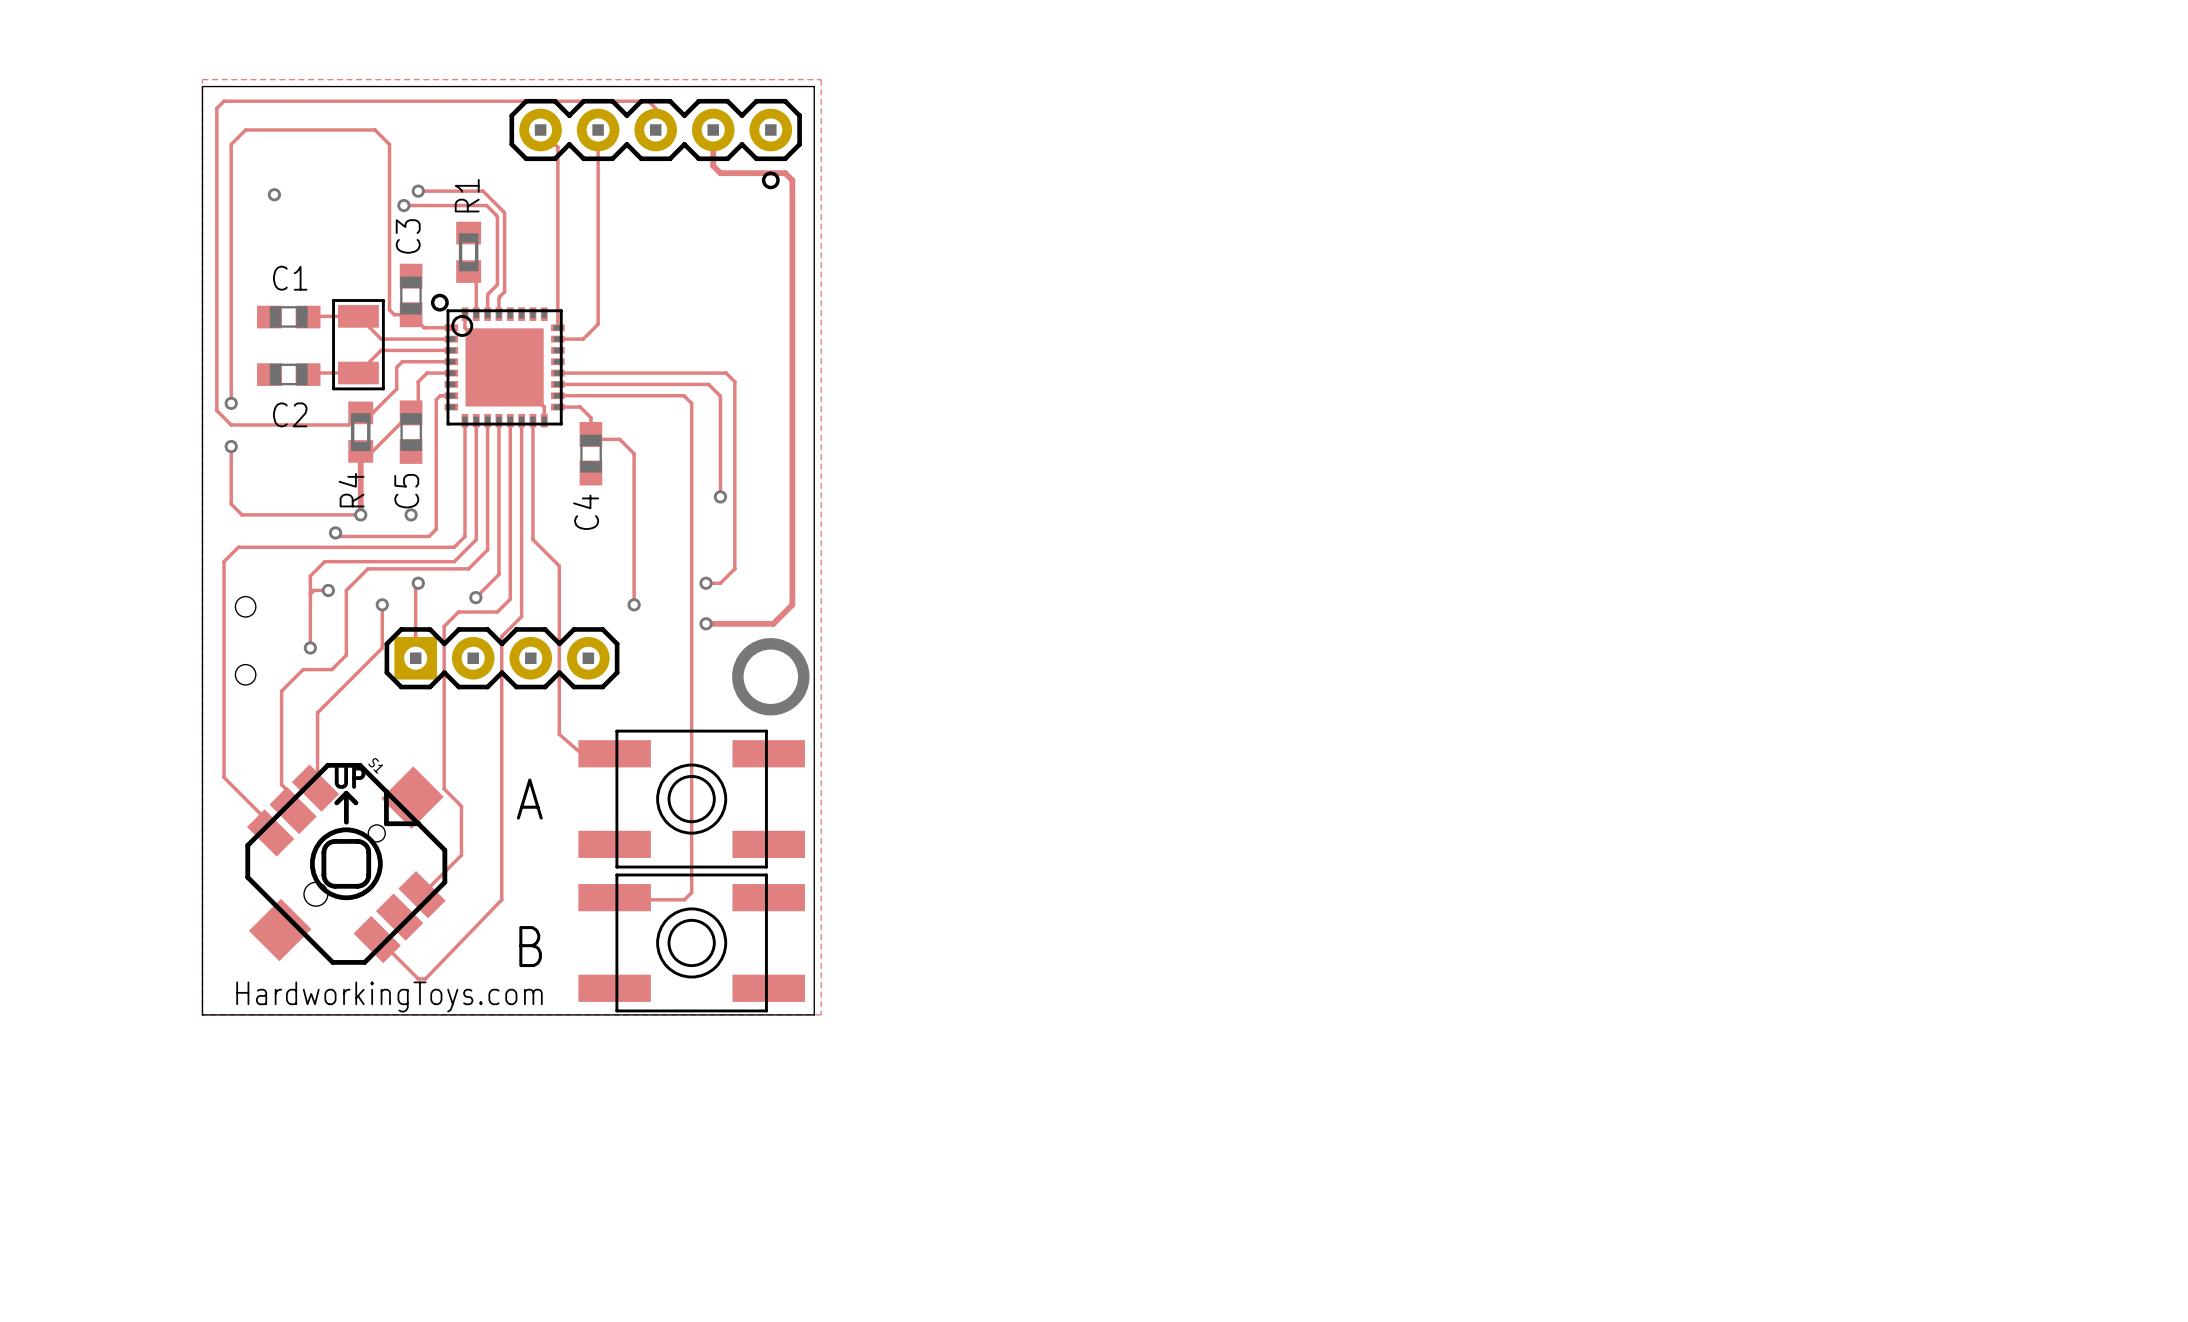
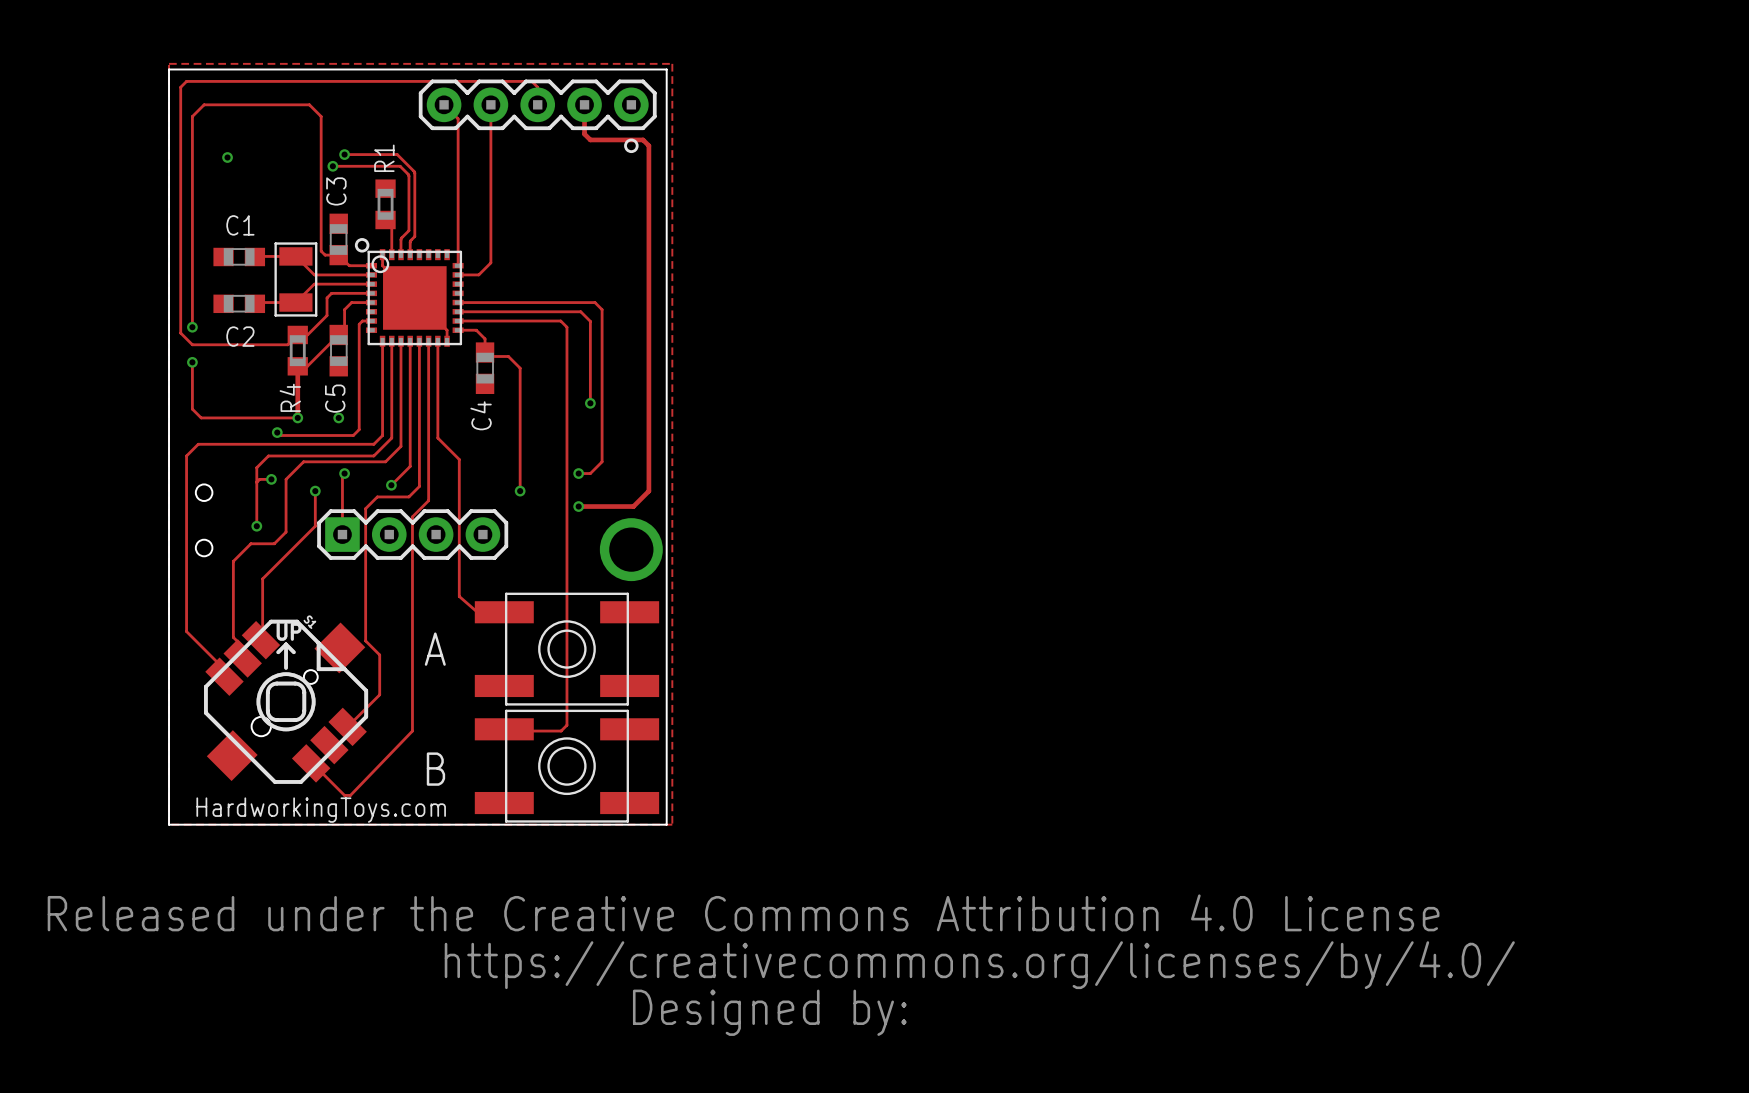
drawing: none -> [47, 894, 1515, 1036]

